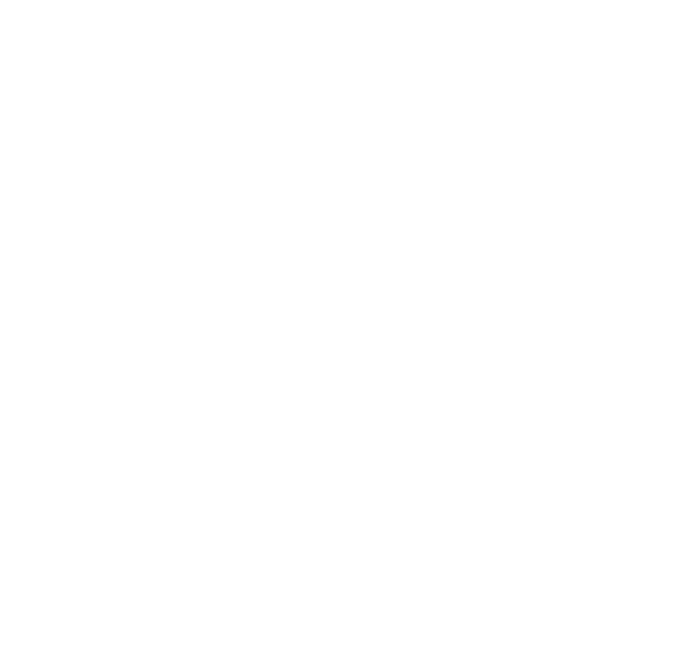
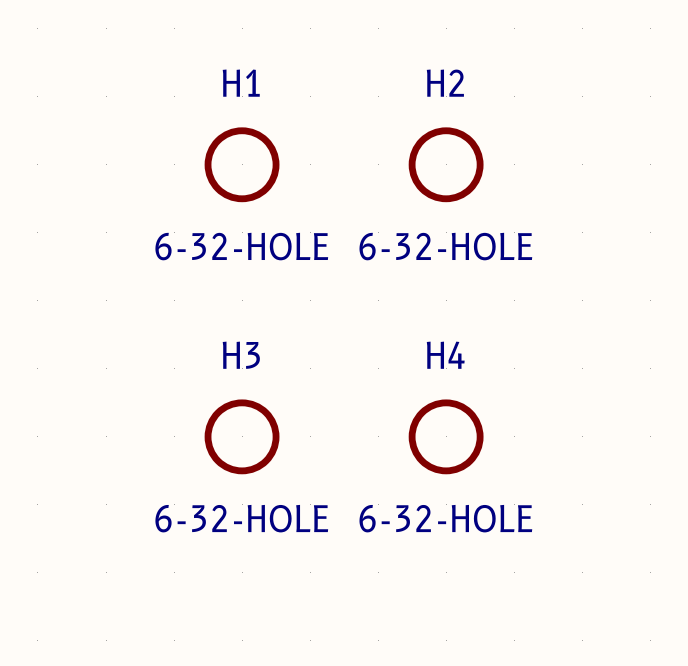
H1: none -> 6-32-HOLE (242, 164)
H2: none -> 6-32-HOLE (446, 164)
H3: none -> 6-32-HOLE (242, 436)
H4: none -> 6-32-HOLE (446, 436)

